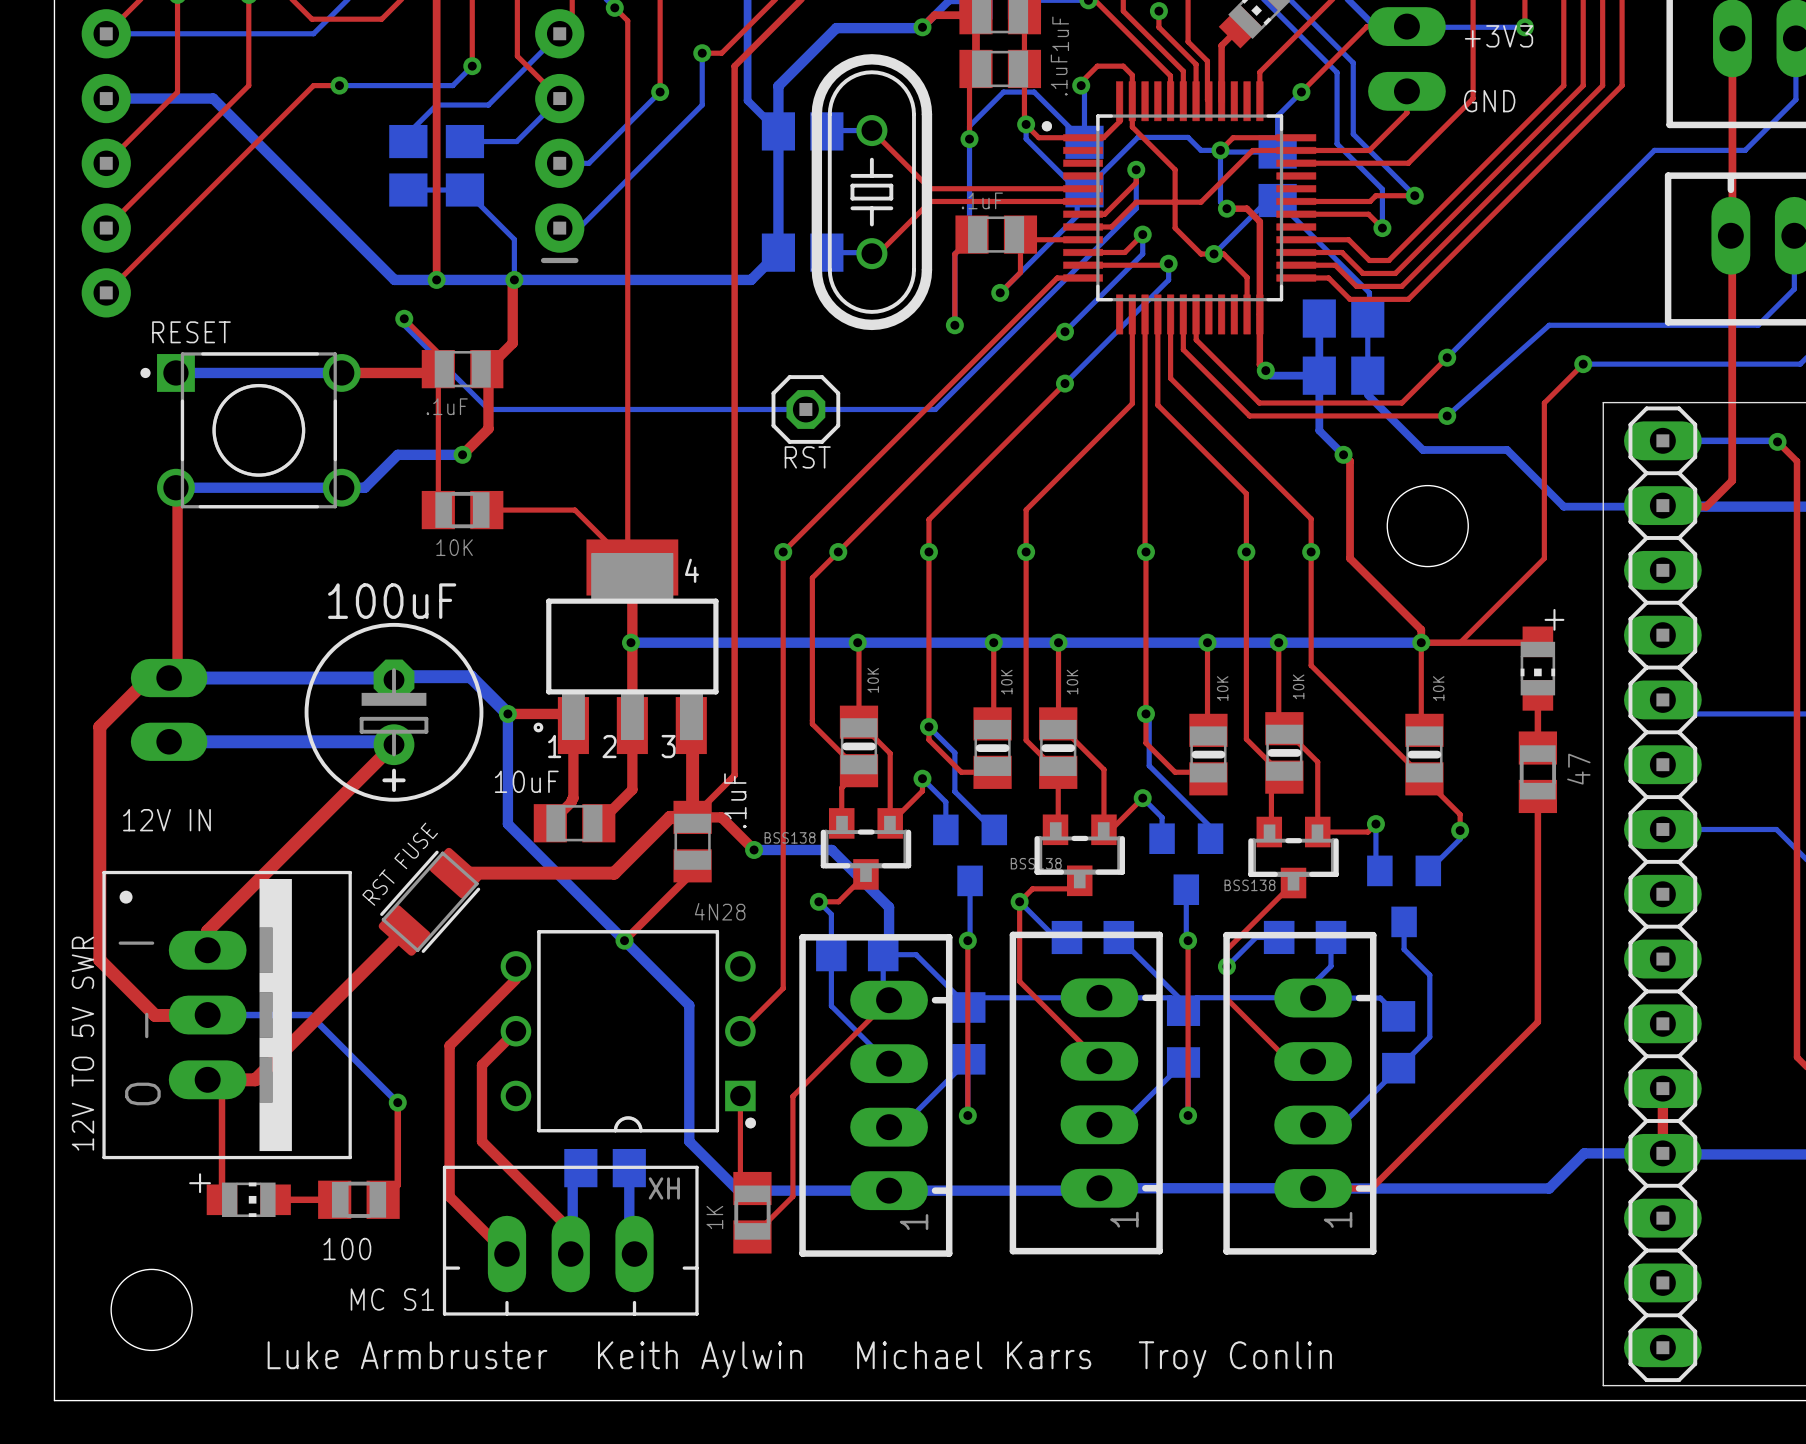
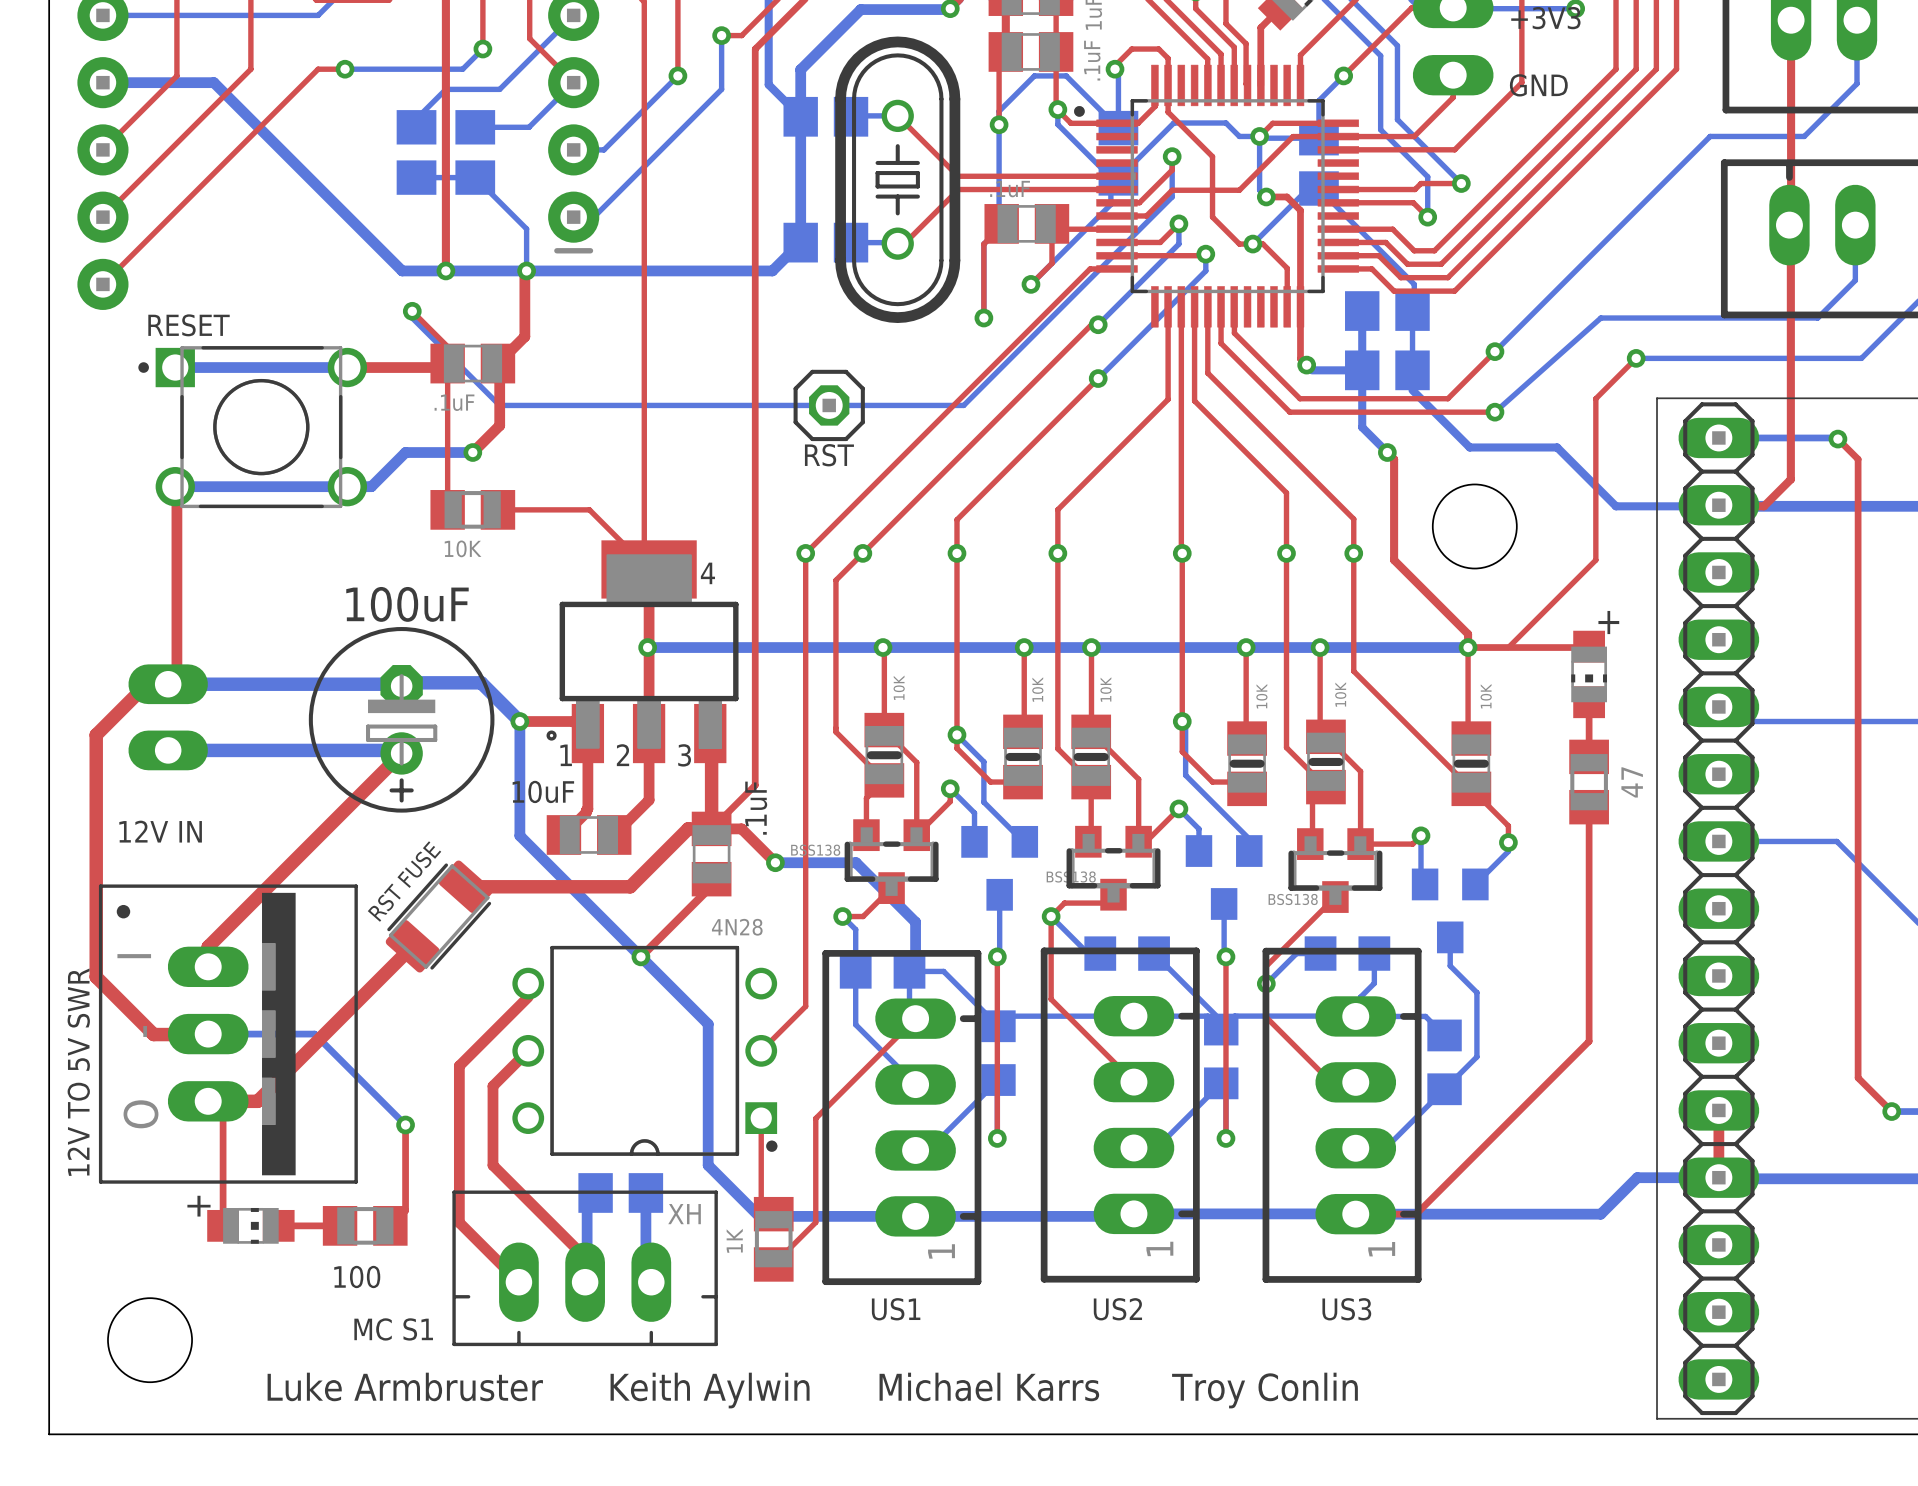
text: none -> US1 (896, 1309)
text: none -> US2 (1117, 1309)
text: none -> US3 (1346, 1309)

